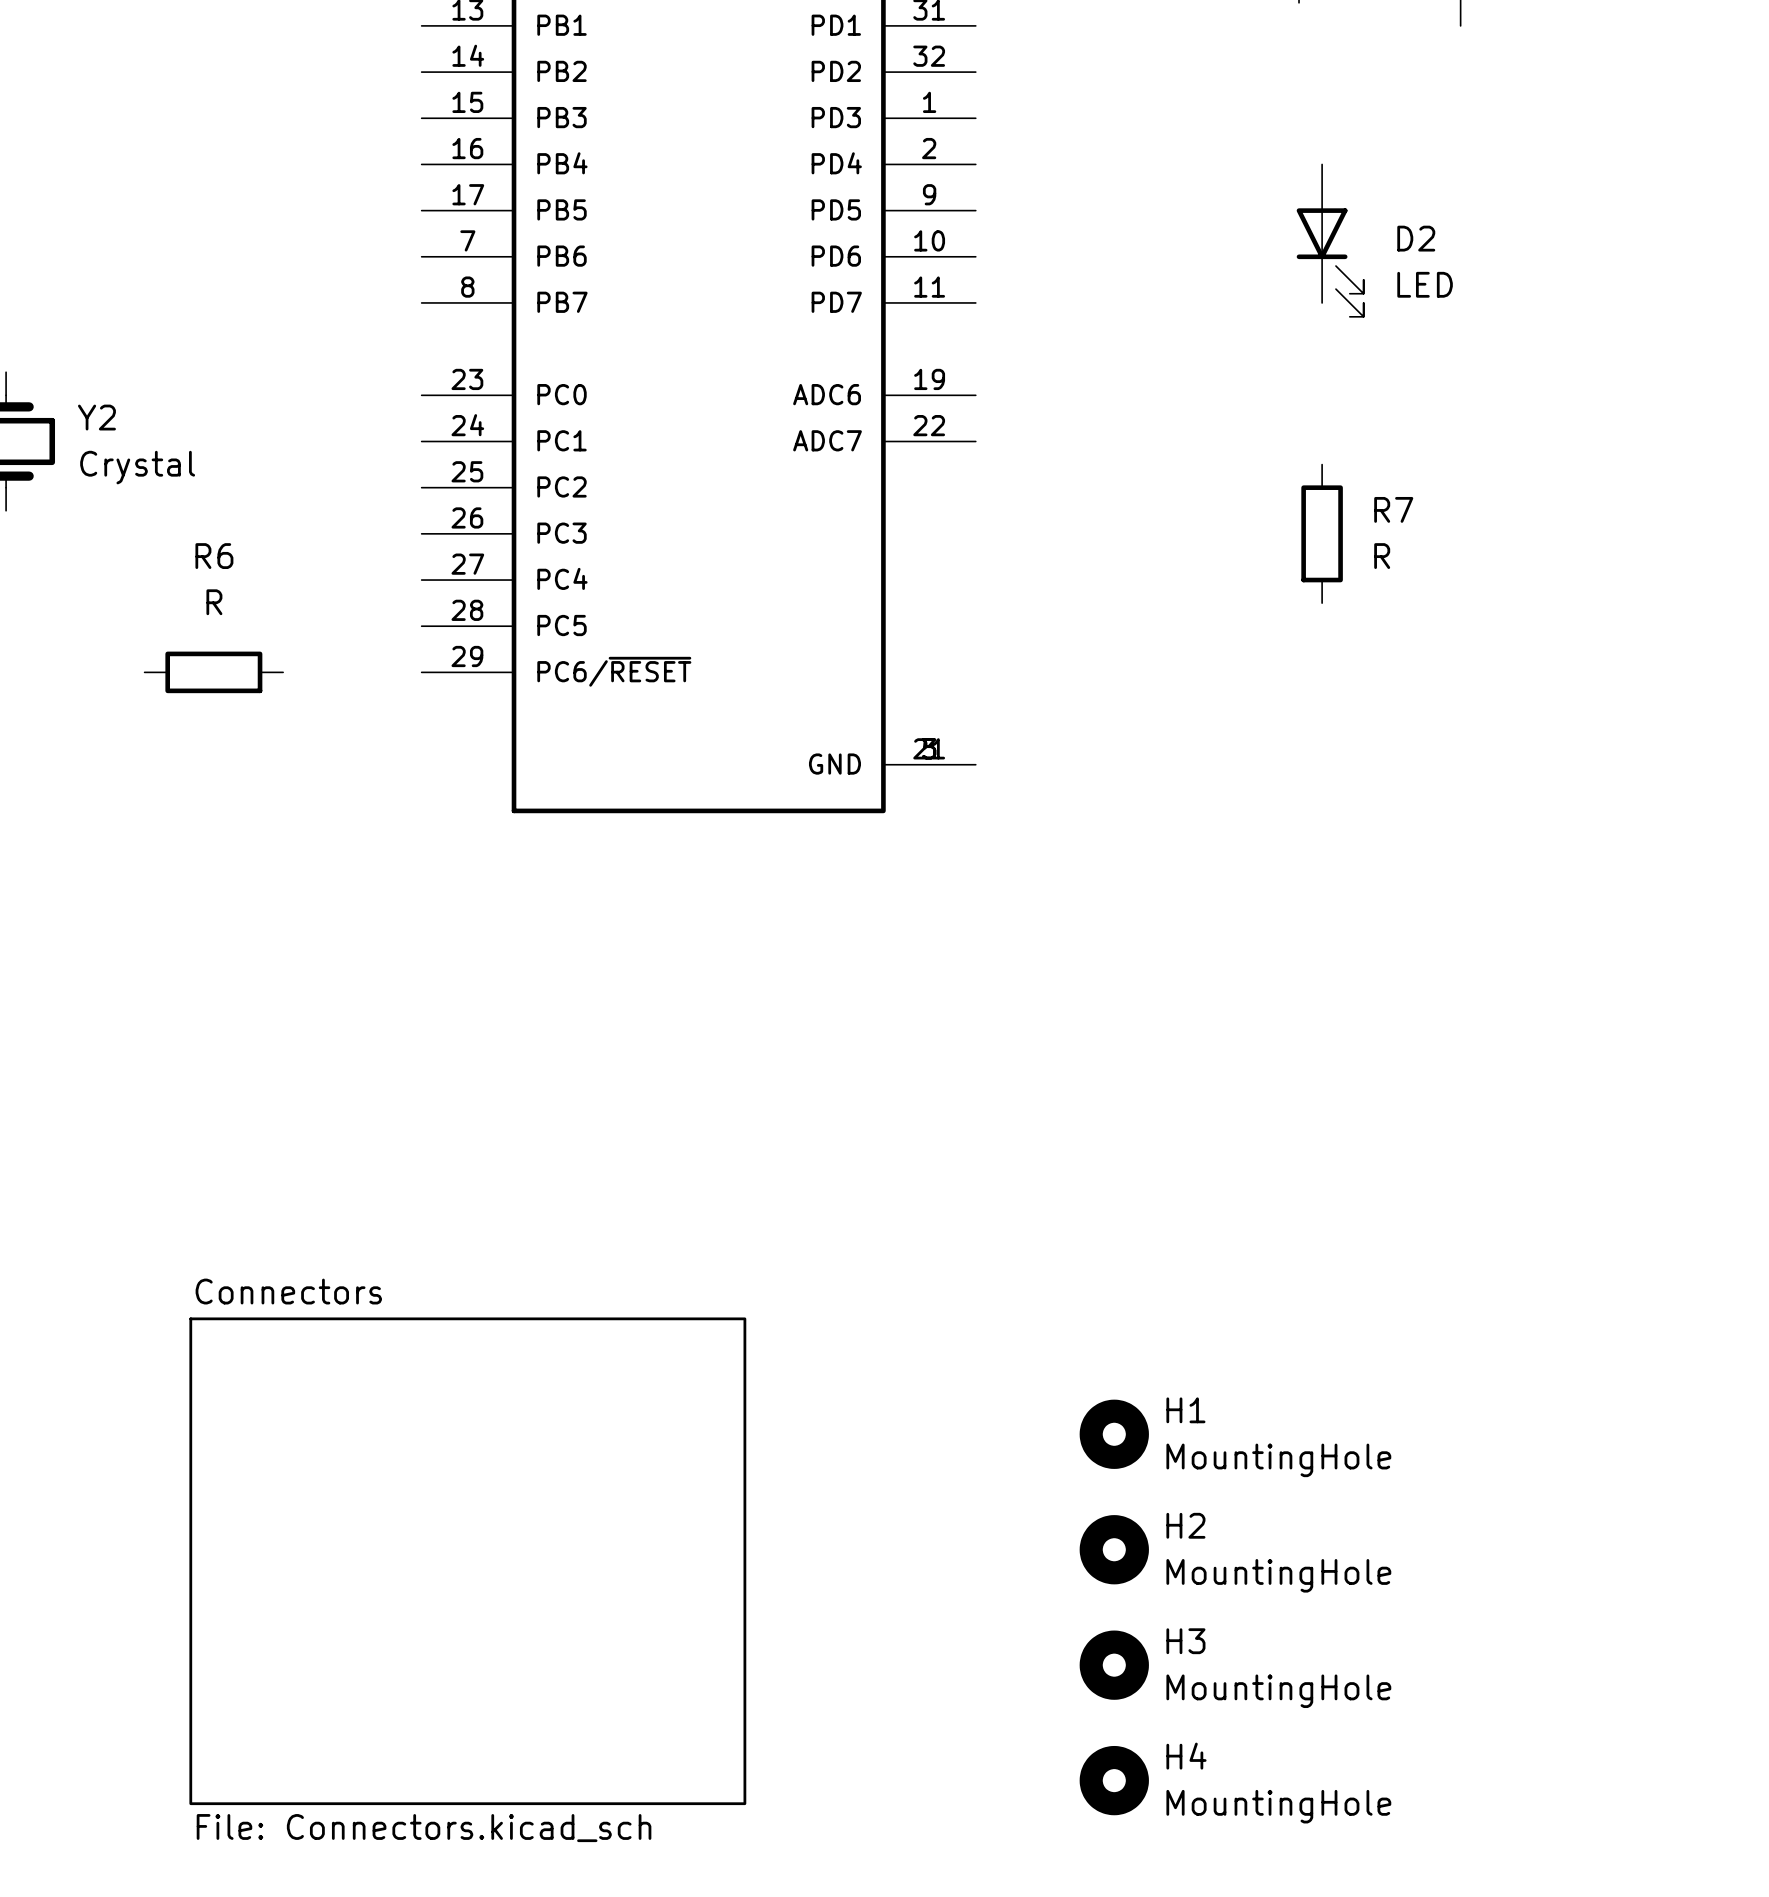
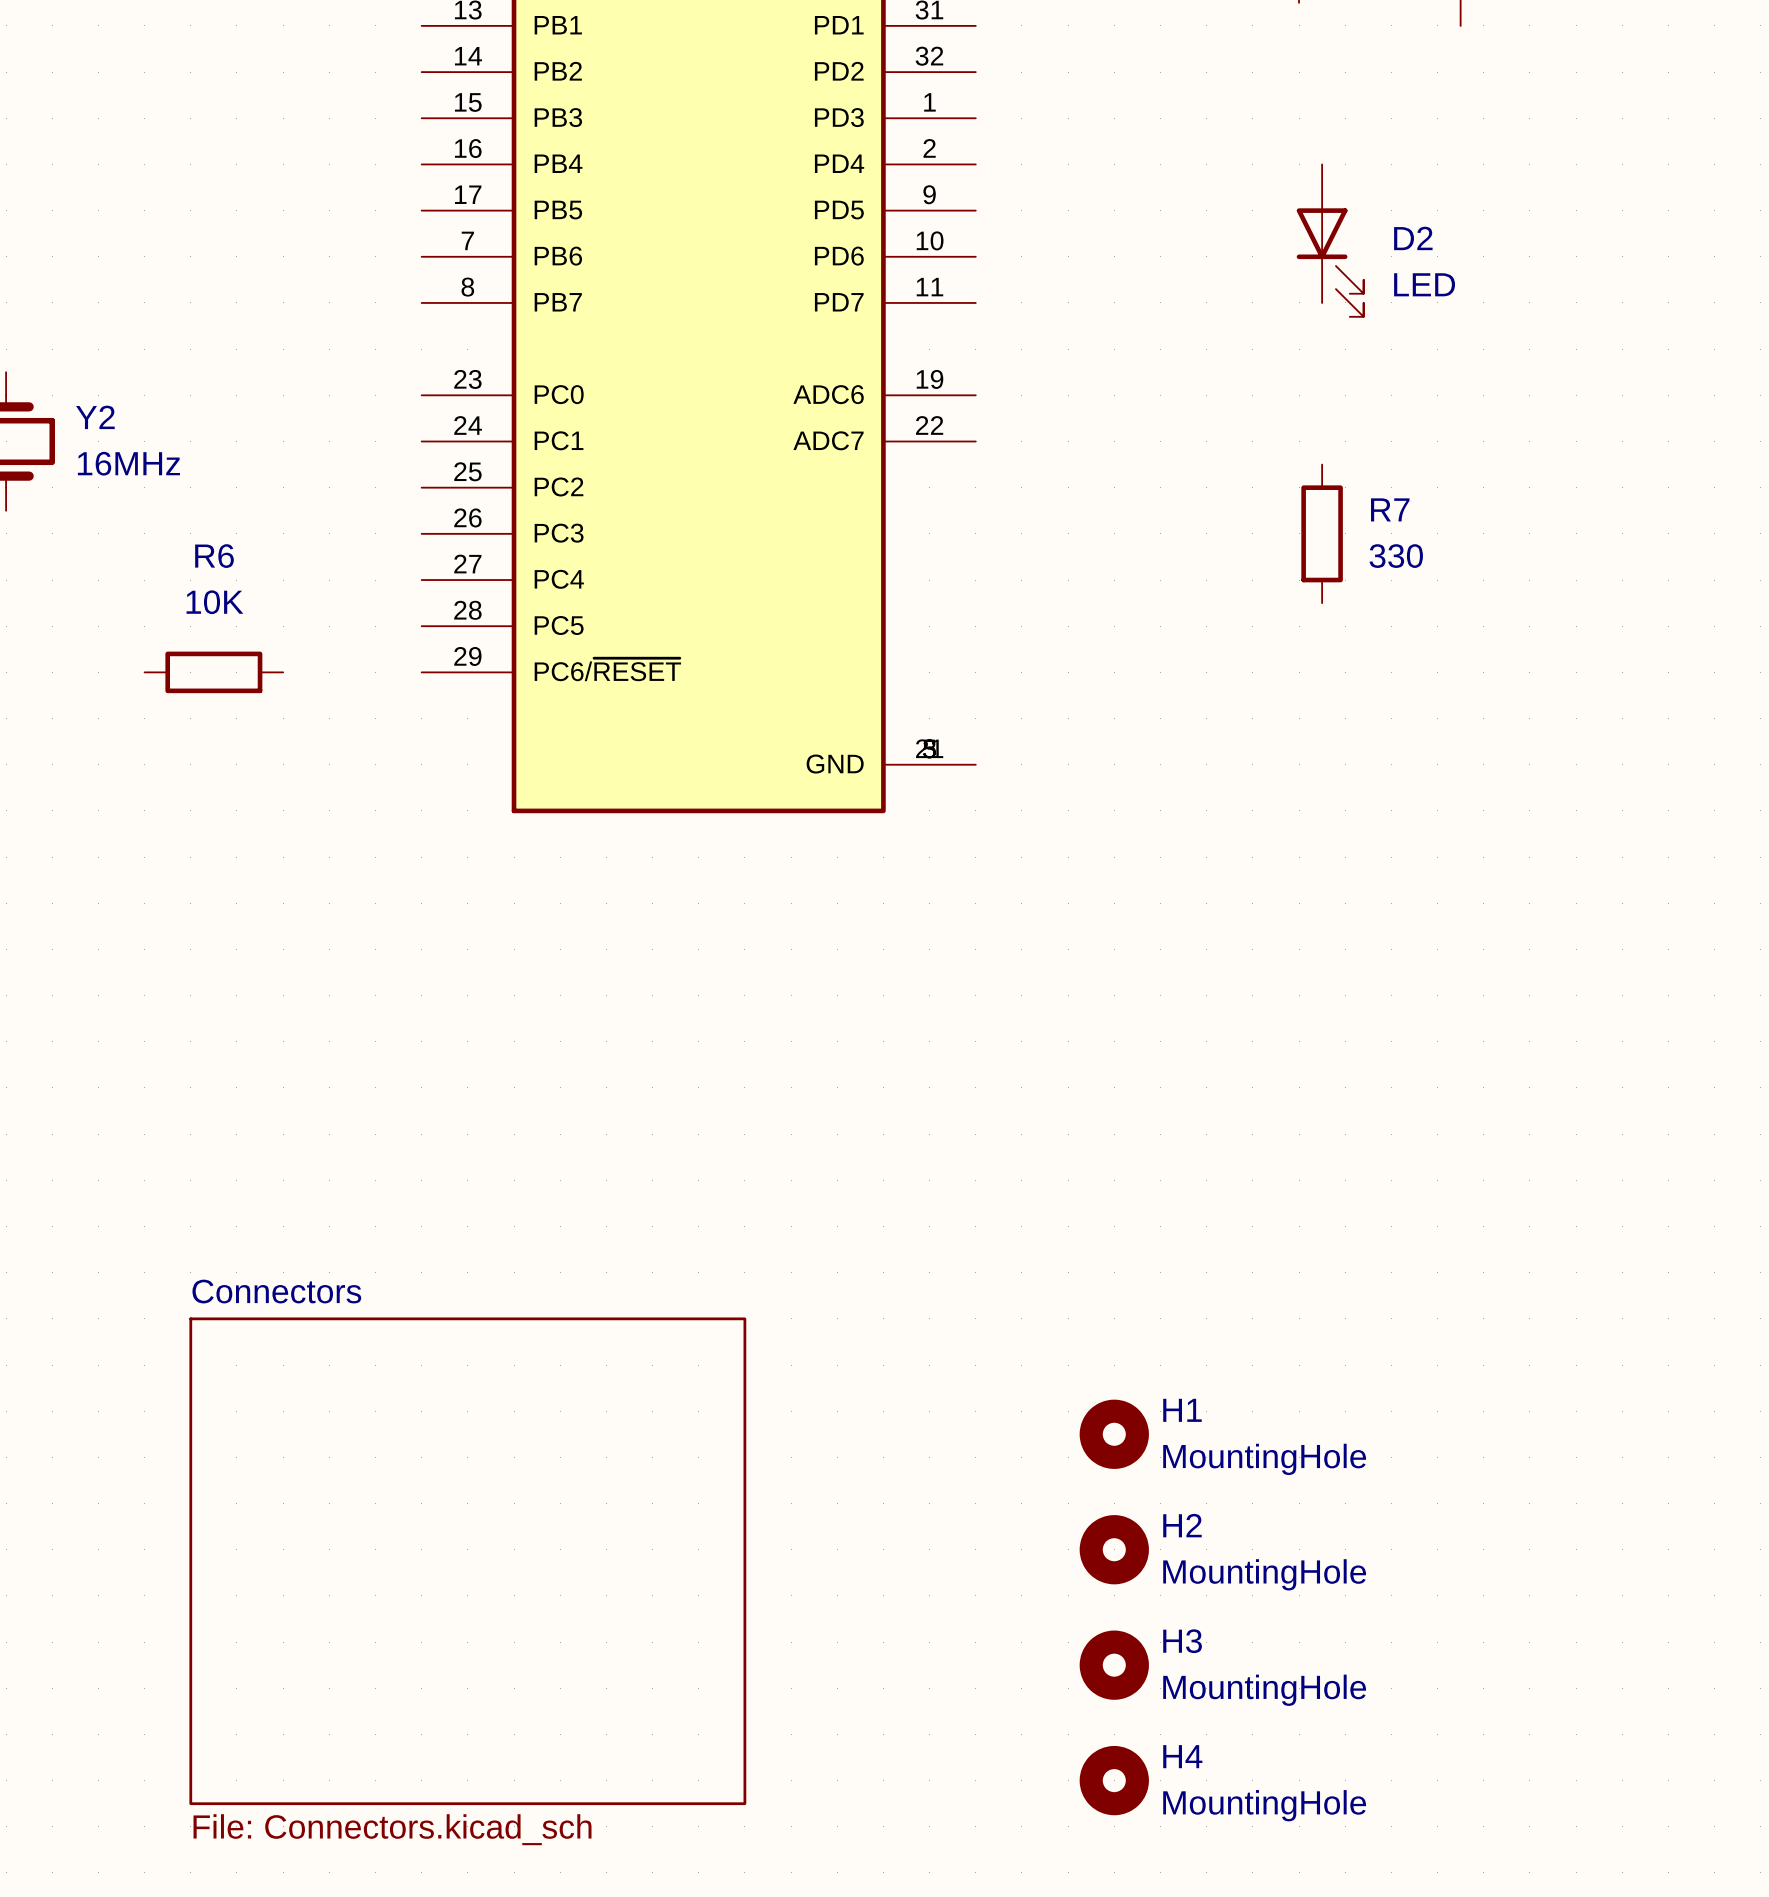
Y2 value: Crystal (137, 467) -> 16MHz (128, 463)
R7 value: R (1382, 556) -> 330 (1396, 556)
R6 value: R (214, 602) -> 10K (214, 602)

